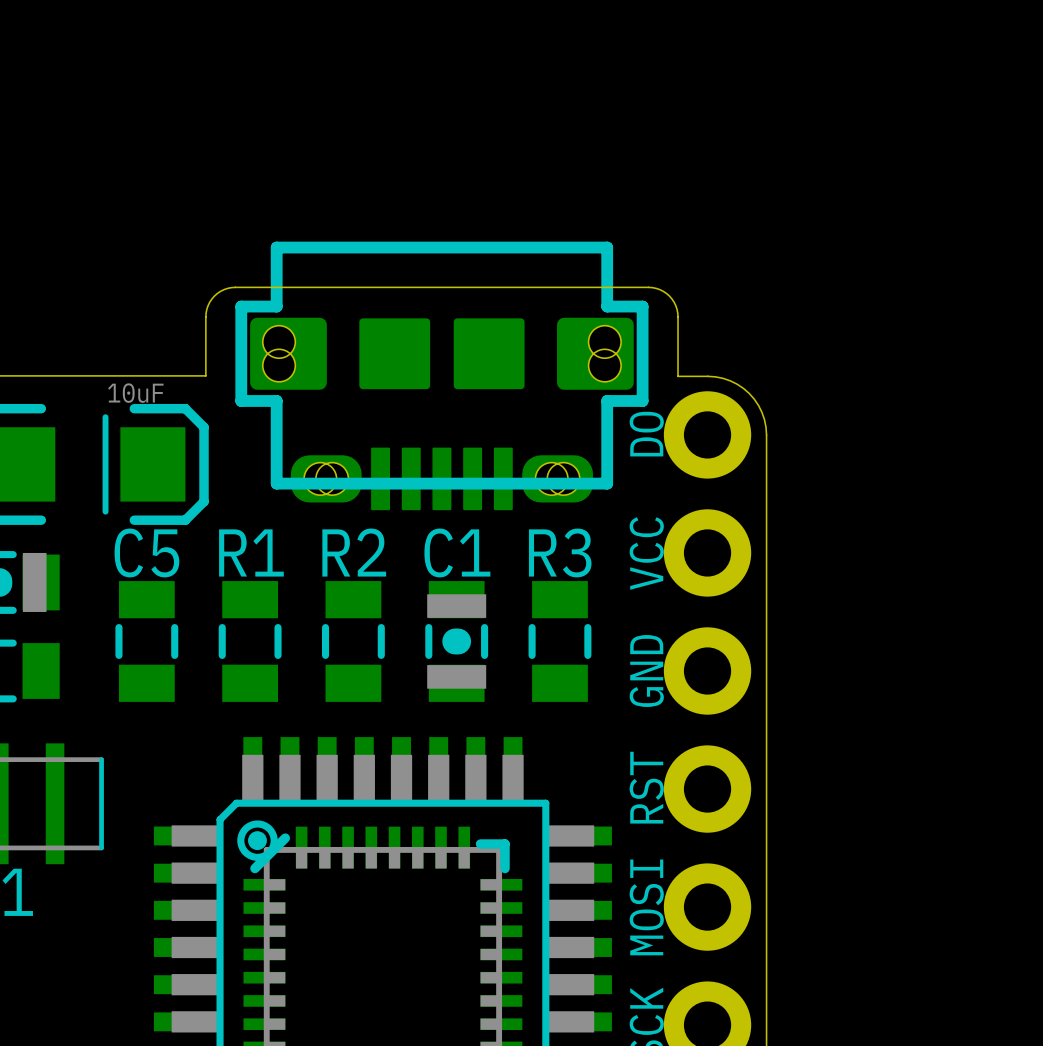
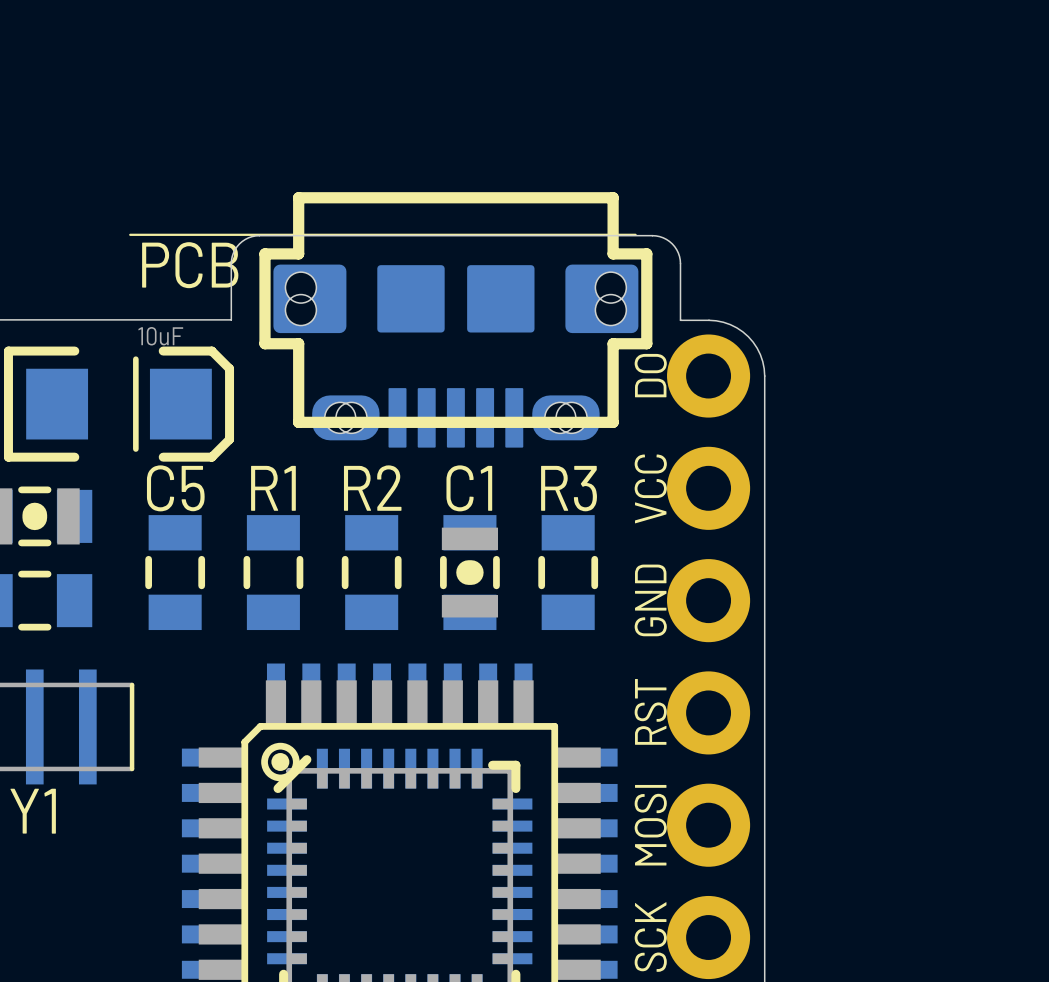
part: none -> (390, 319)
part: (441, 375) -> none

